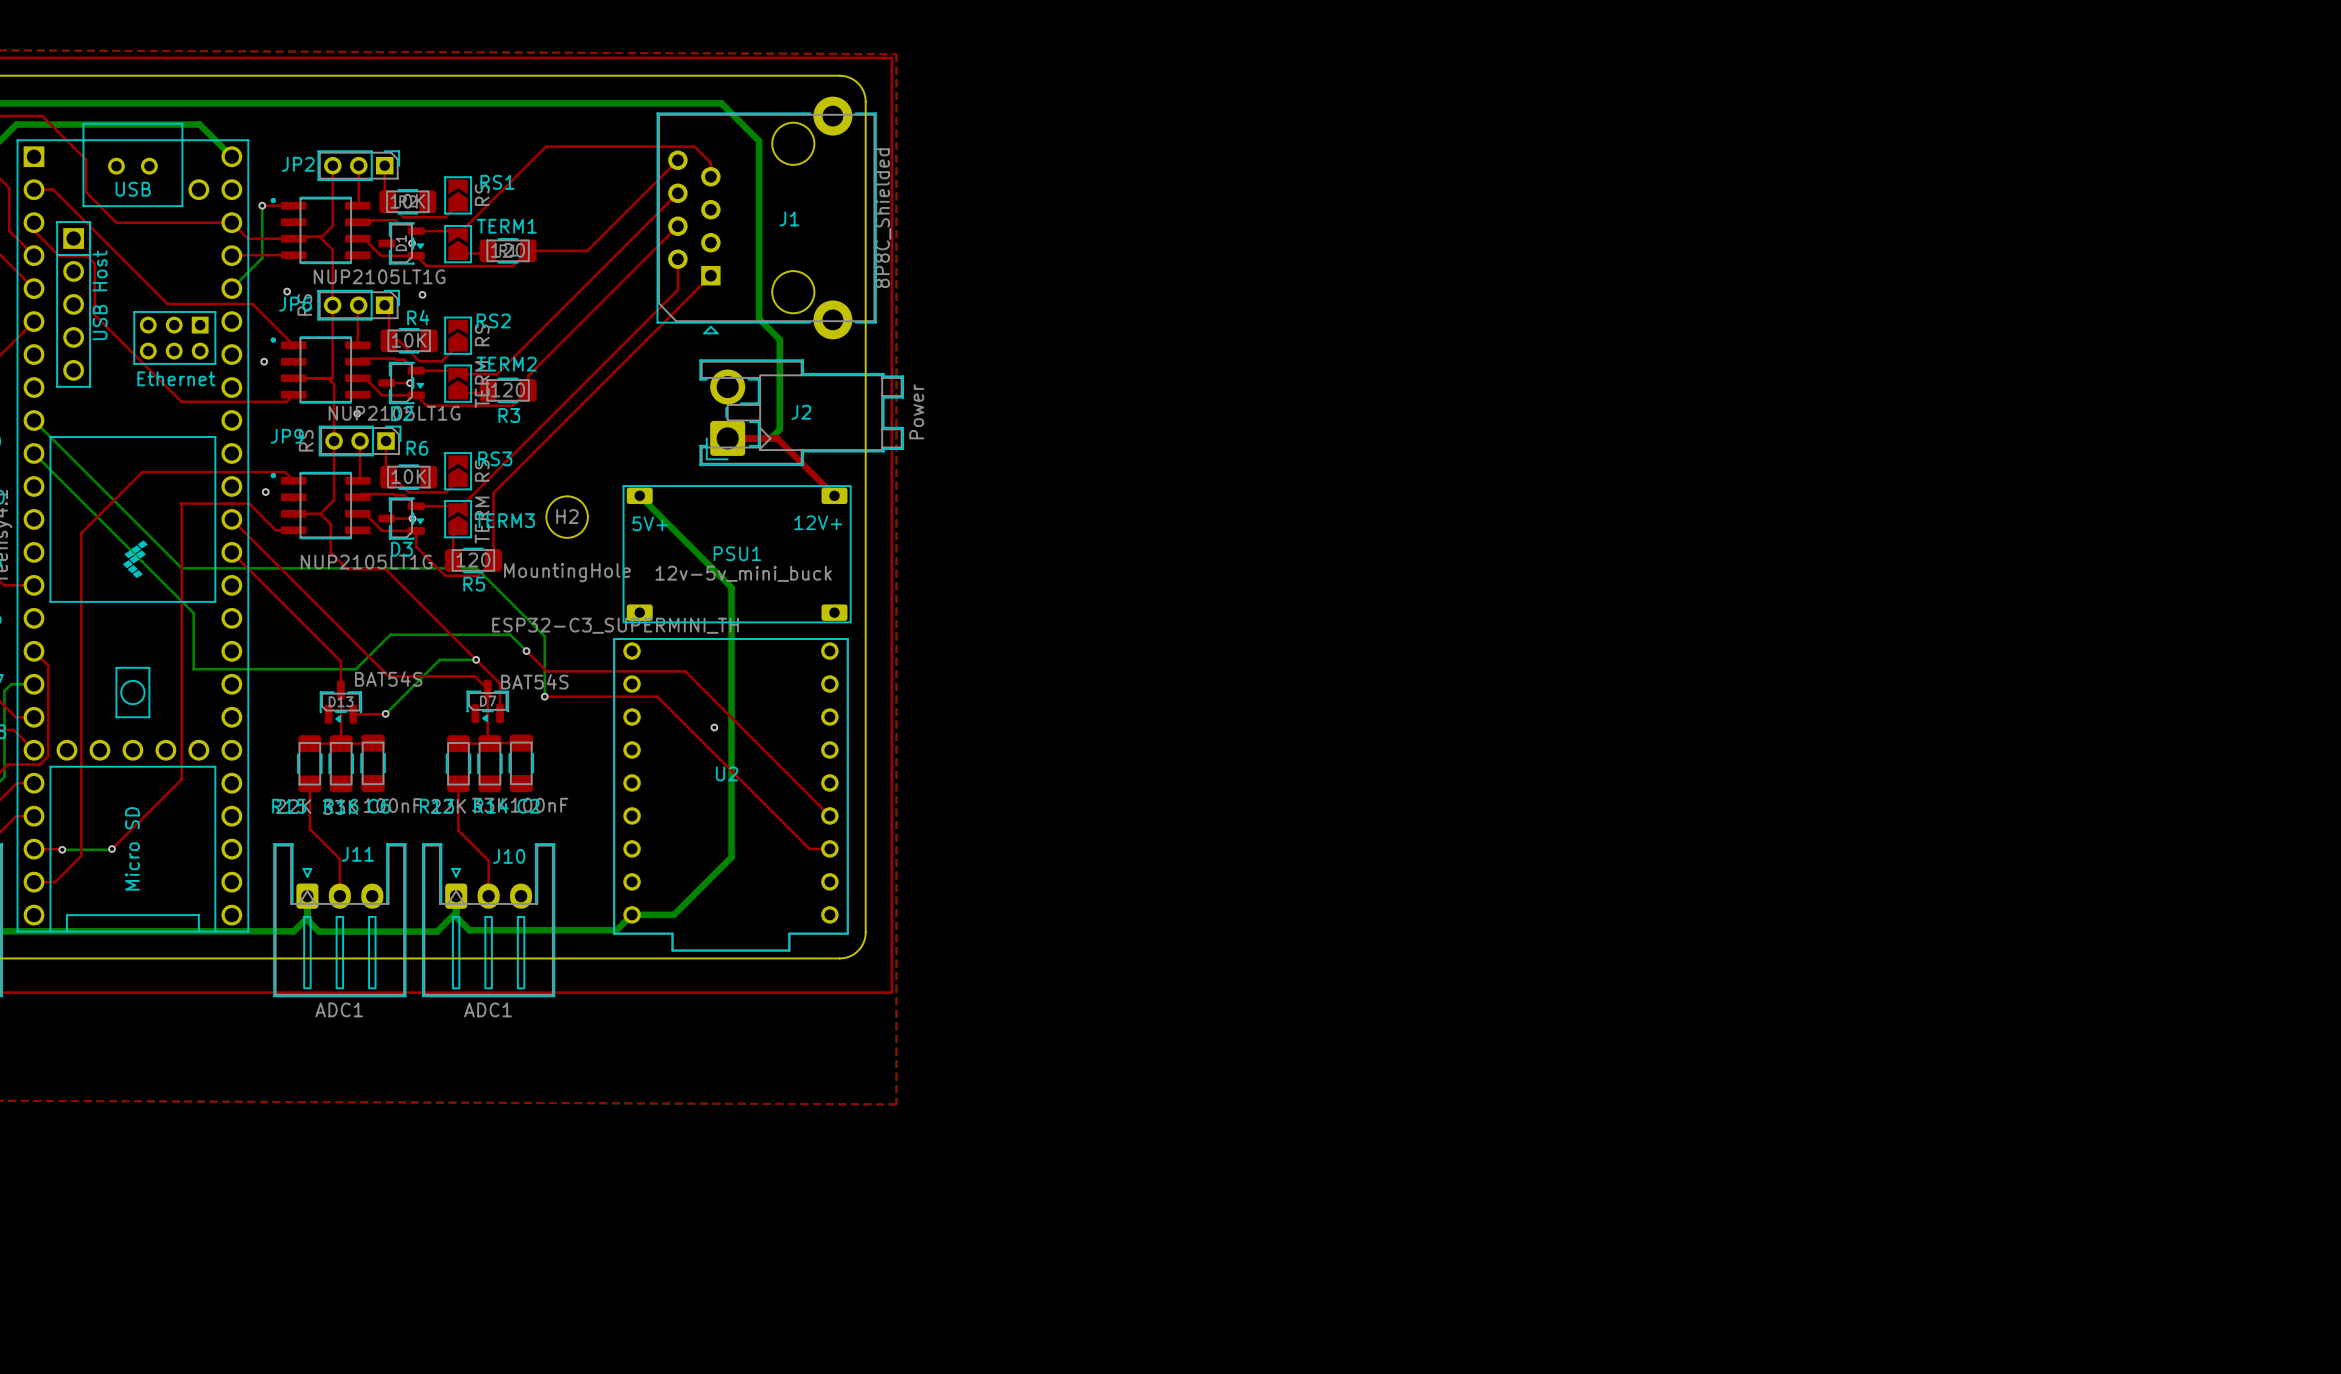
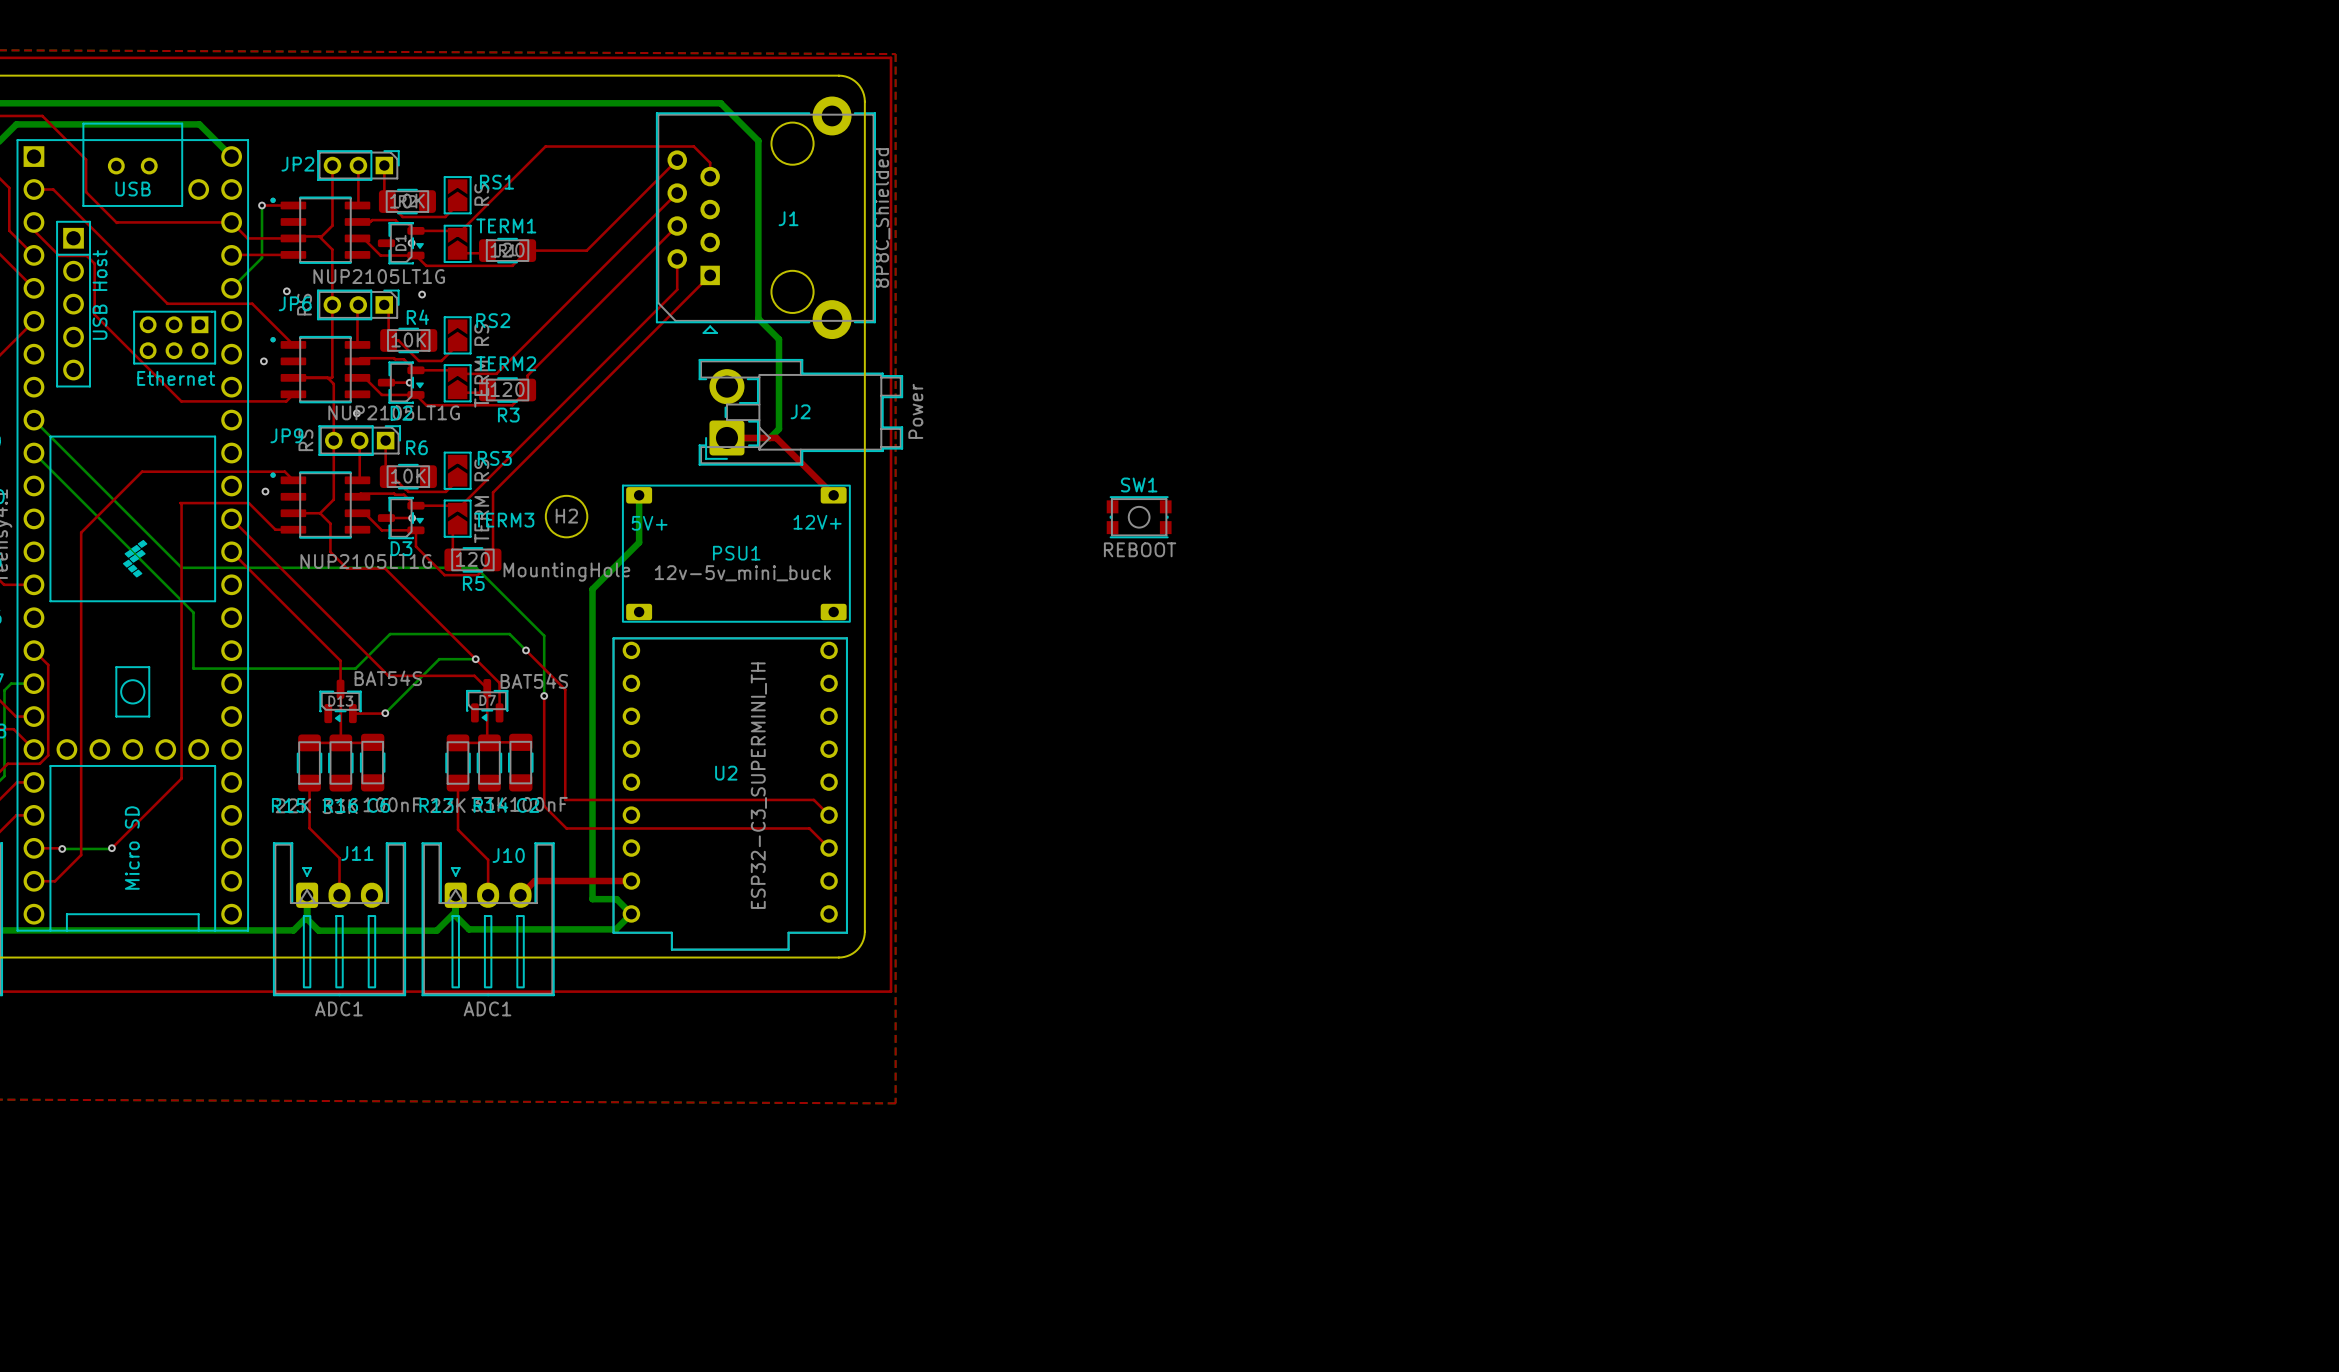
bottom track: (639, 495) (731, 587) (731, 857) (674, 914) (632, 914) -> (639, 495) (639, 542) (592, 589) (592, 899) (616, 899) (631, 913)
SW1: none -> REBOOT (1139, 517)
U2 value rotation: 0° (615, 625) -> 90° counterclockwise (758, 785)
top track: (546, 671) (685, 671) (814, 800) -> (546, 670) (565, 689) (565, 799) (813, 799)
top track: (544, 696) (657, 696) (809, 848) (829, 848) -> (544, 695) (544, 806) (566, 828) (809, 828) (829, 848)
via: (714, 727) -> none
top track: none -> (631, 881) (534, 881) (520, 895)

